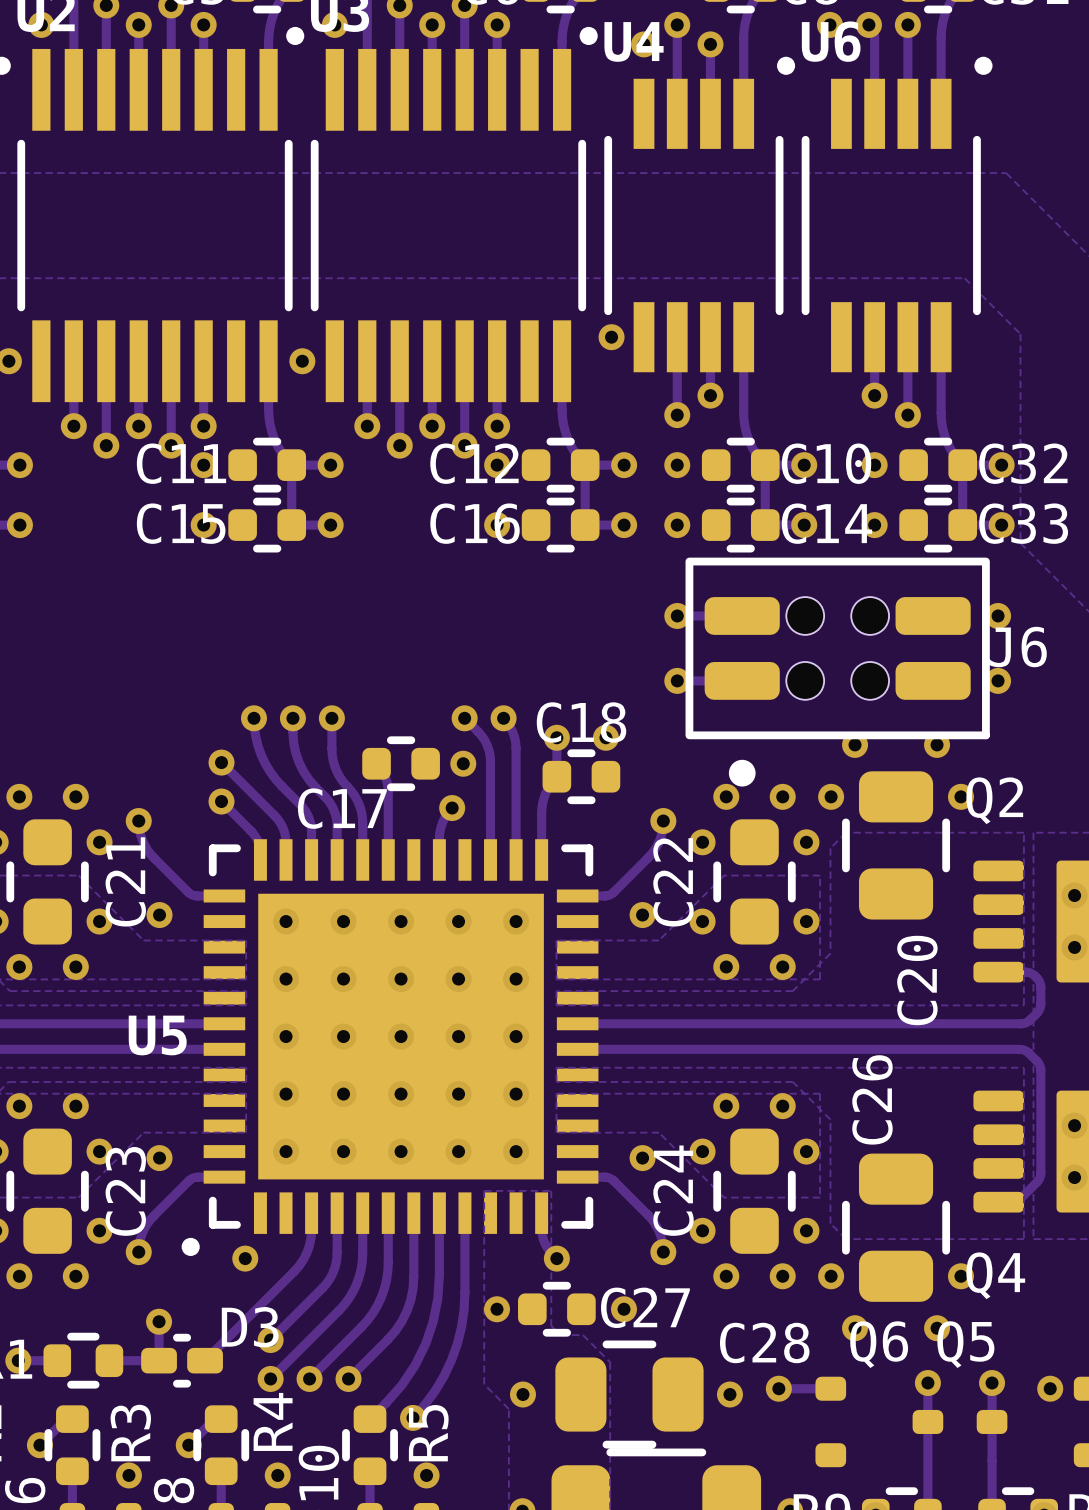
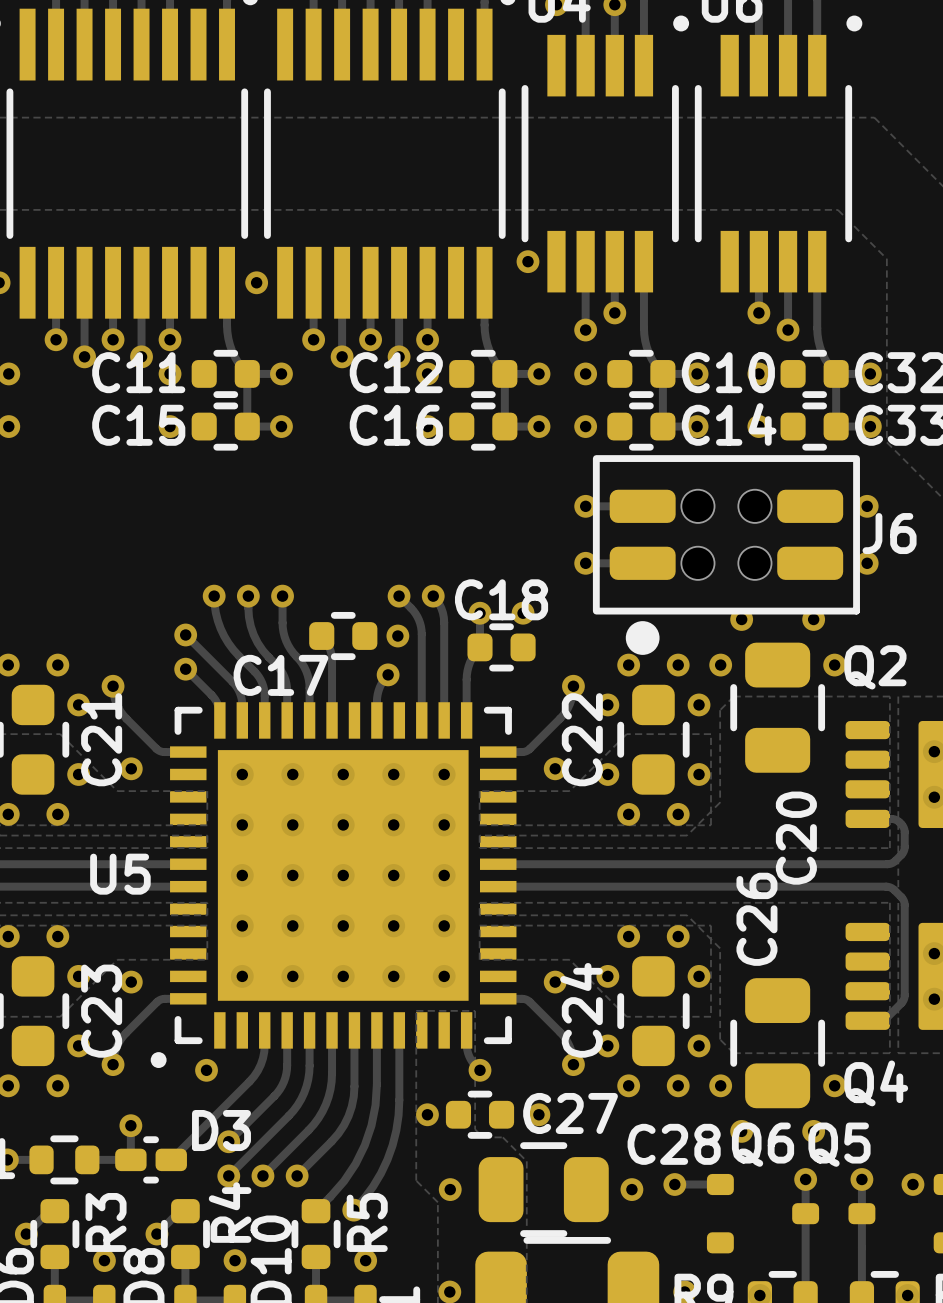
J6 footprint: [685, 557, 990, 787] -> [592, 455, 860, 655]

